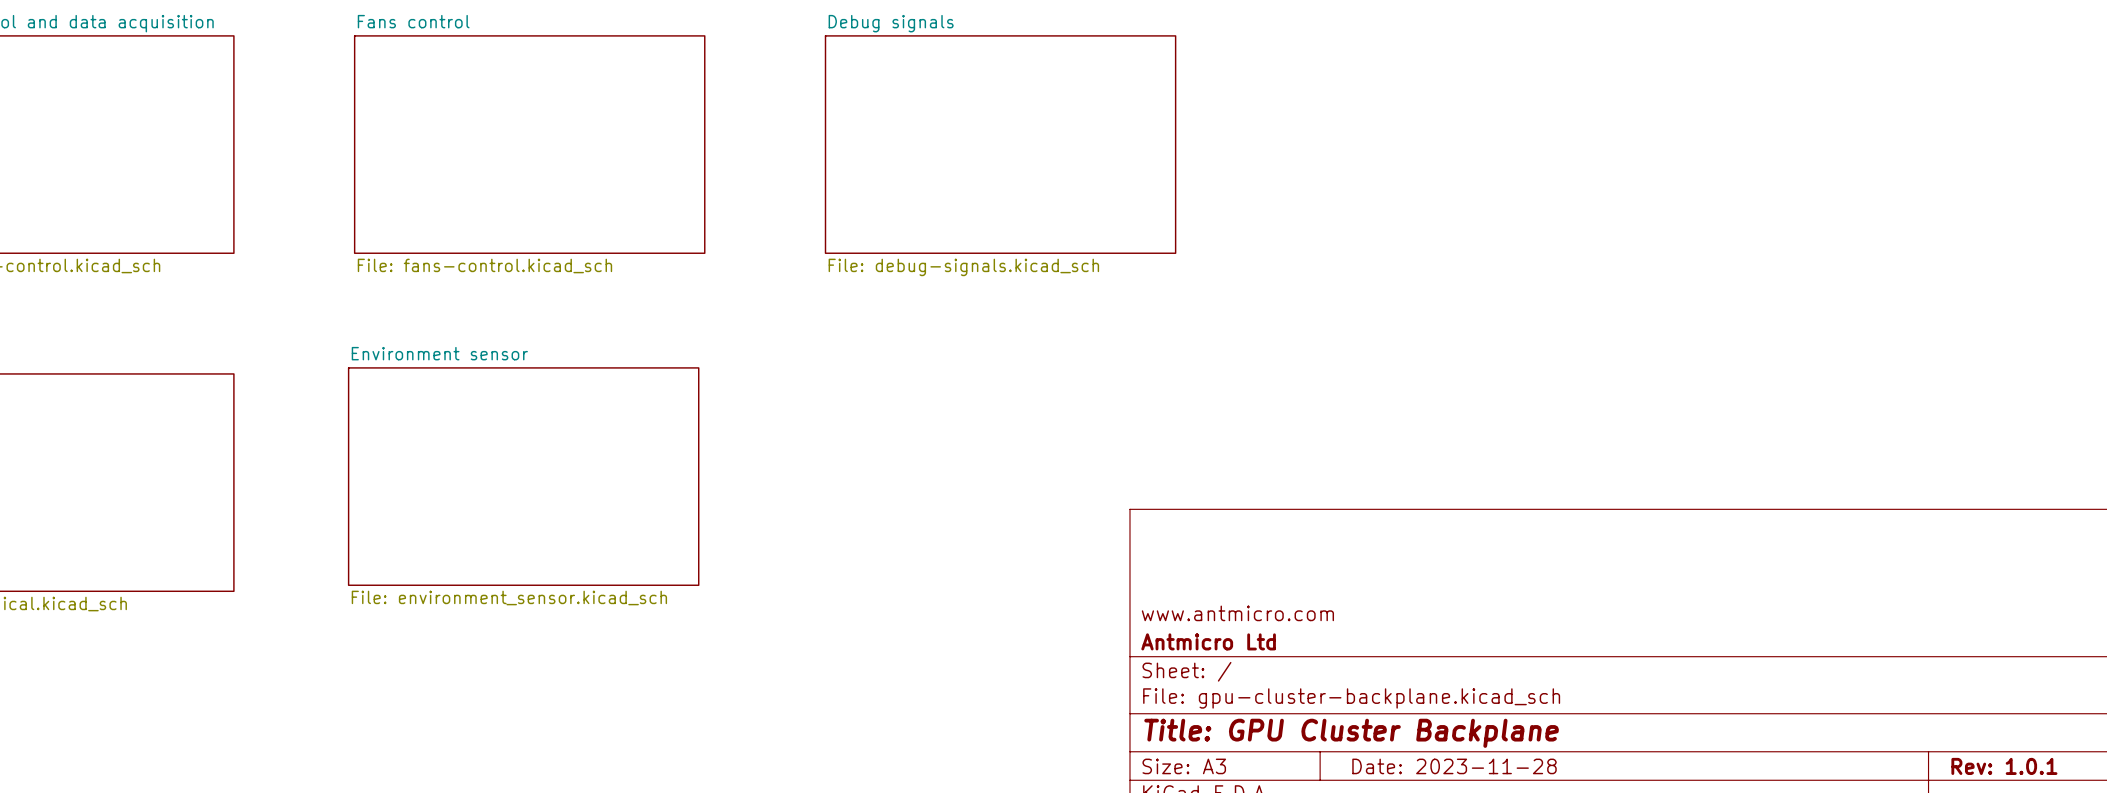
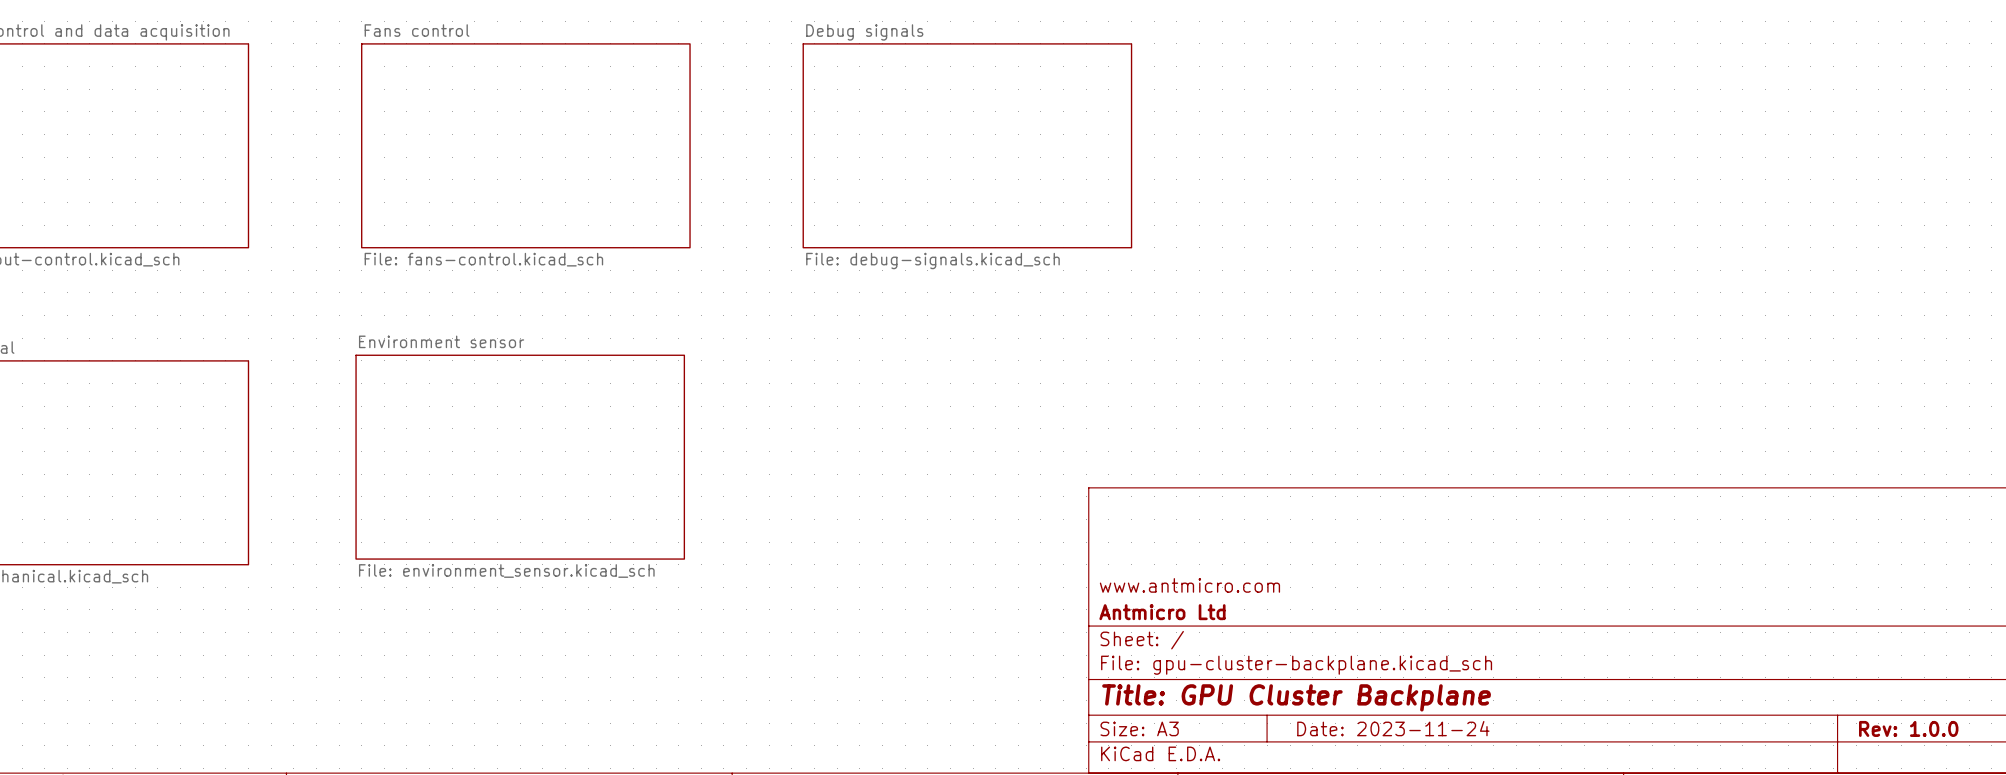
title block: Date: 2023-11-28 (1454, 766) -> Date: 2023-11-24 (1393, 728)
title block: Rev: 1.0.1 (2004, 766) -> Rev: 1.0.0 (1908, 728)

